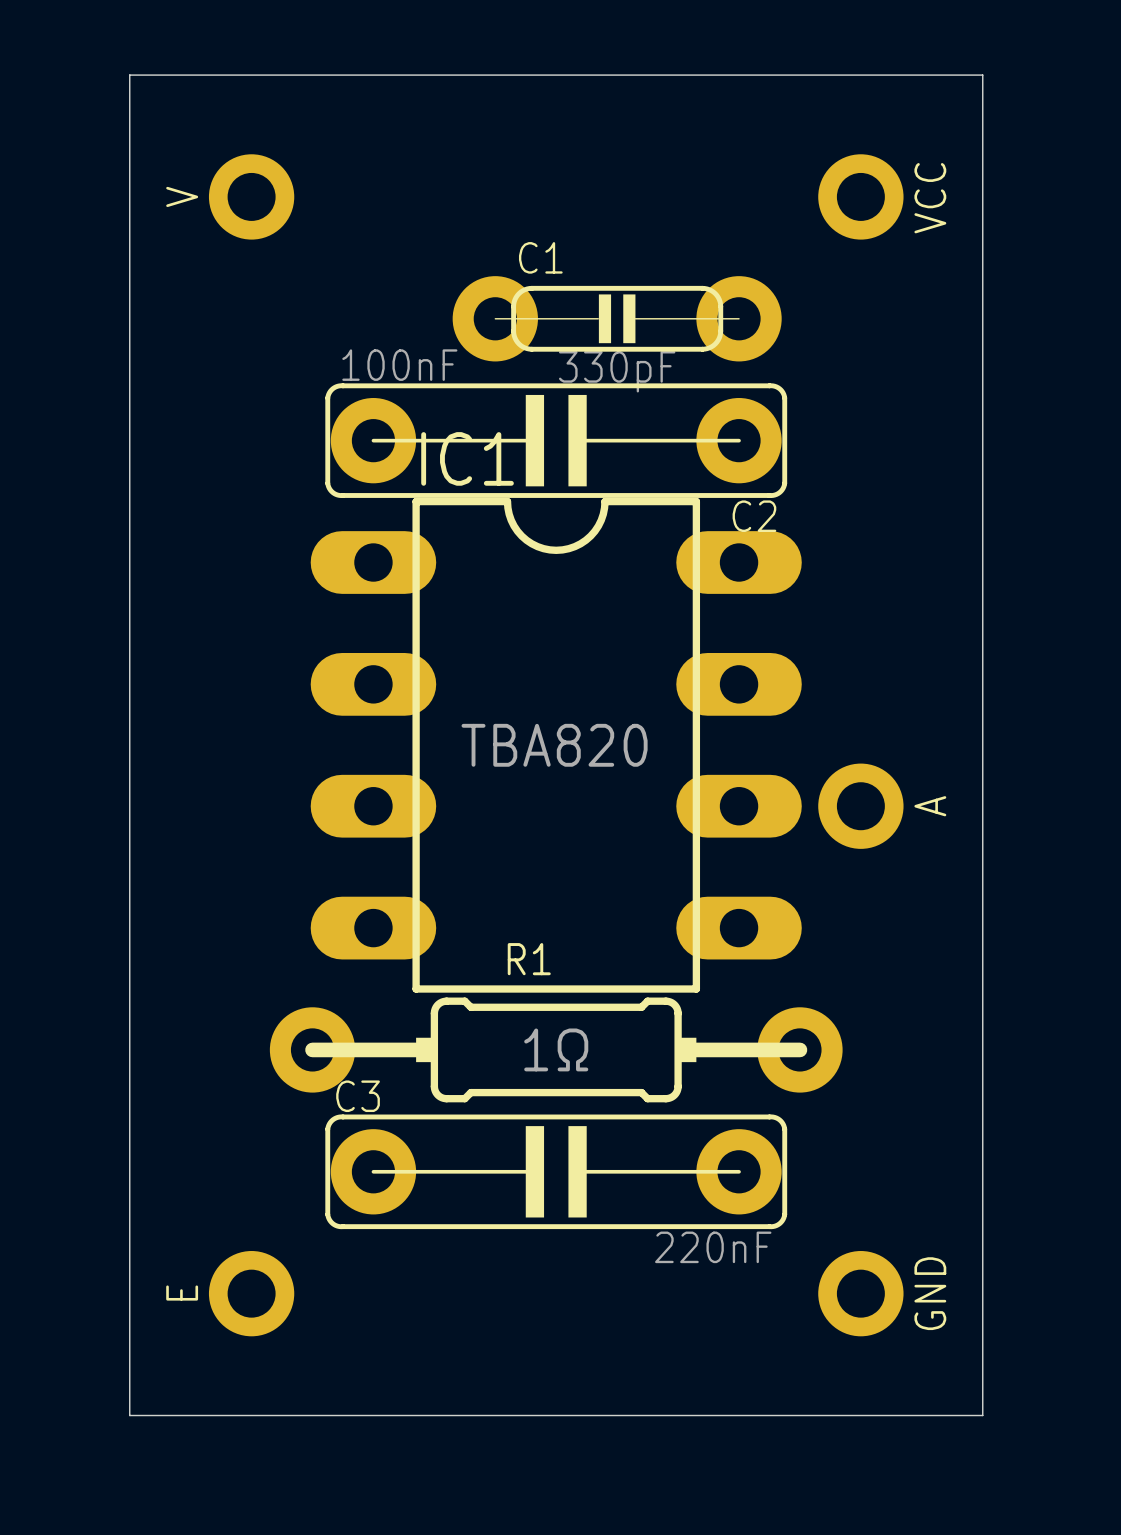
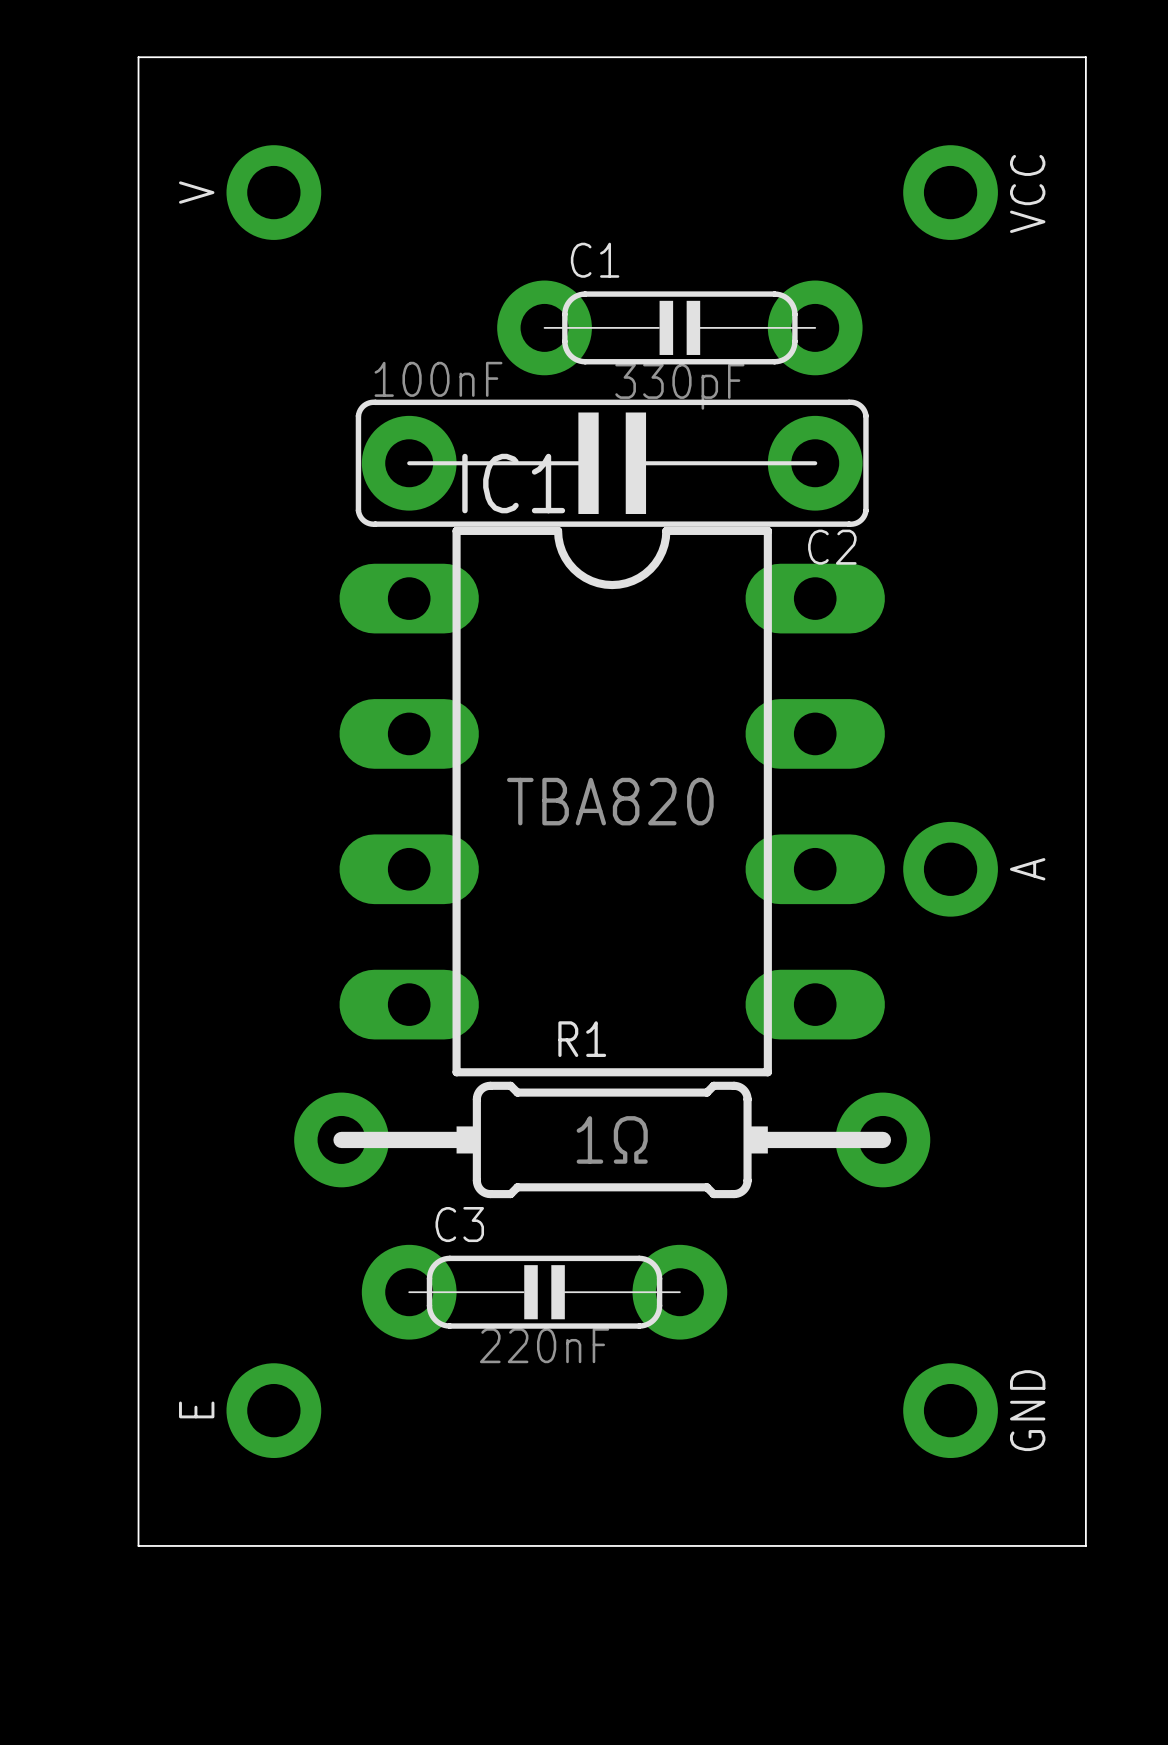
C3 name position: C3 (358, 1096) -> C3 (459, 1224)
C3 footprint: [325, 1114, 788, 1230] -> [361, 1244, 728, 1340]
C3 value position: 220nF (713, 1247) -> 220nF (544, 1345)

